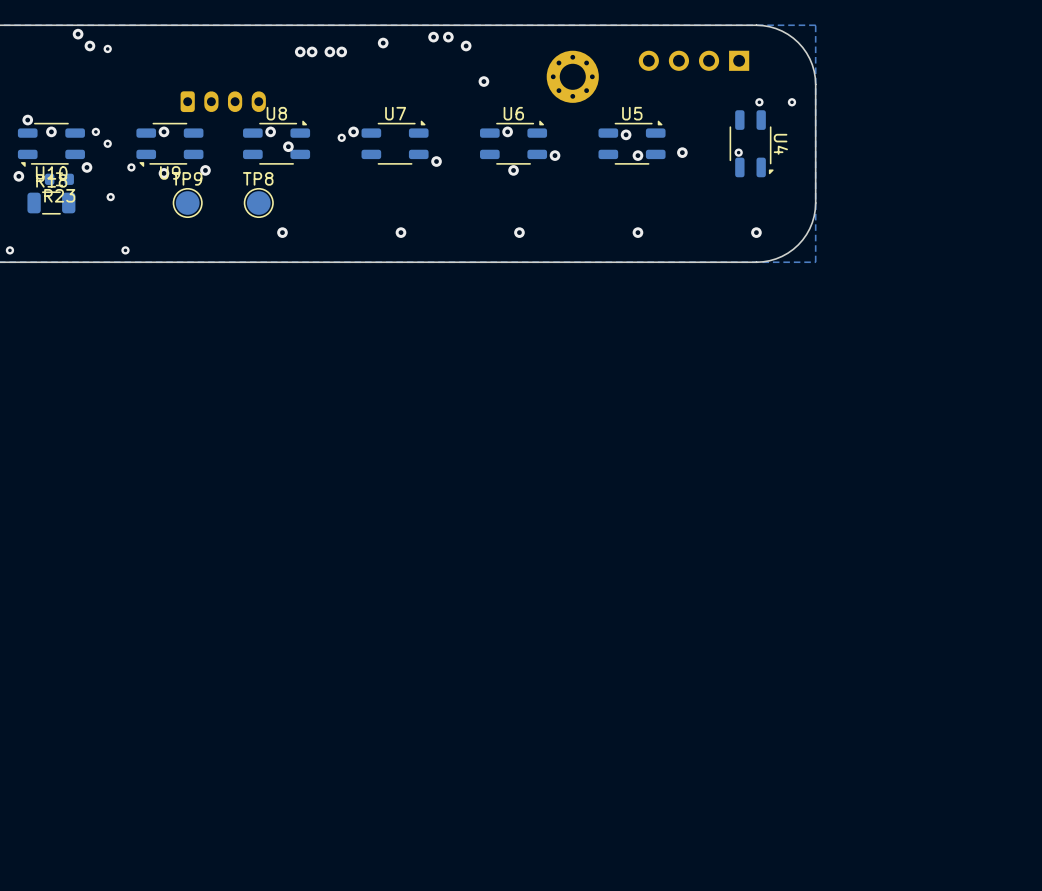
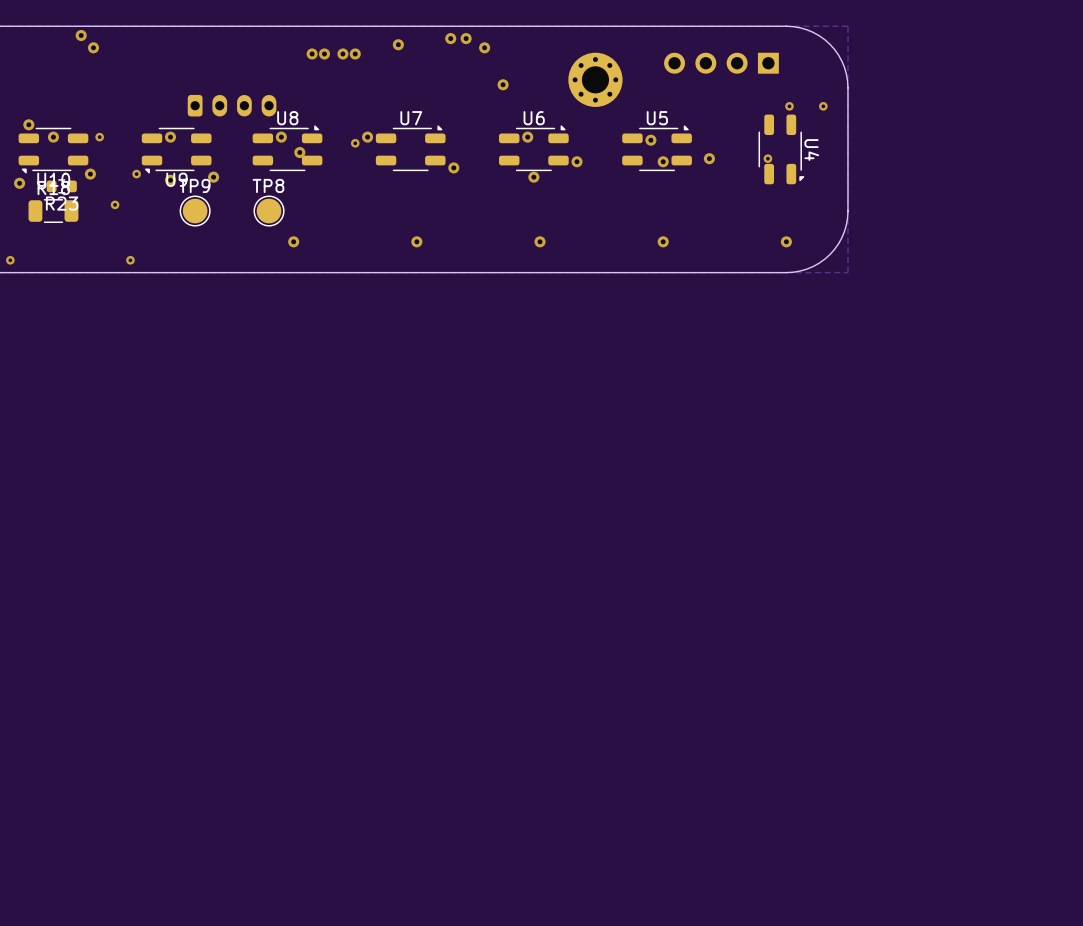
via: (107, 48) -> none
via: (107, 143) -> none

